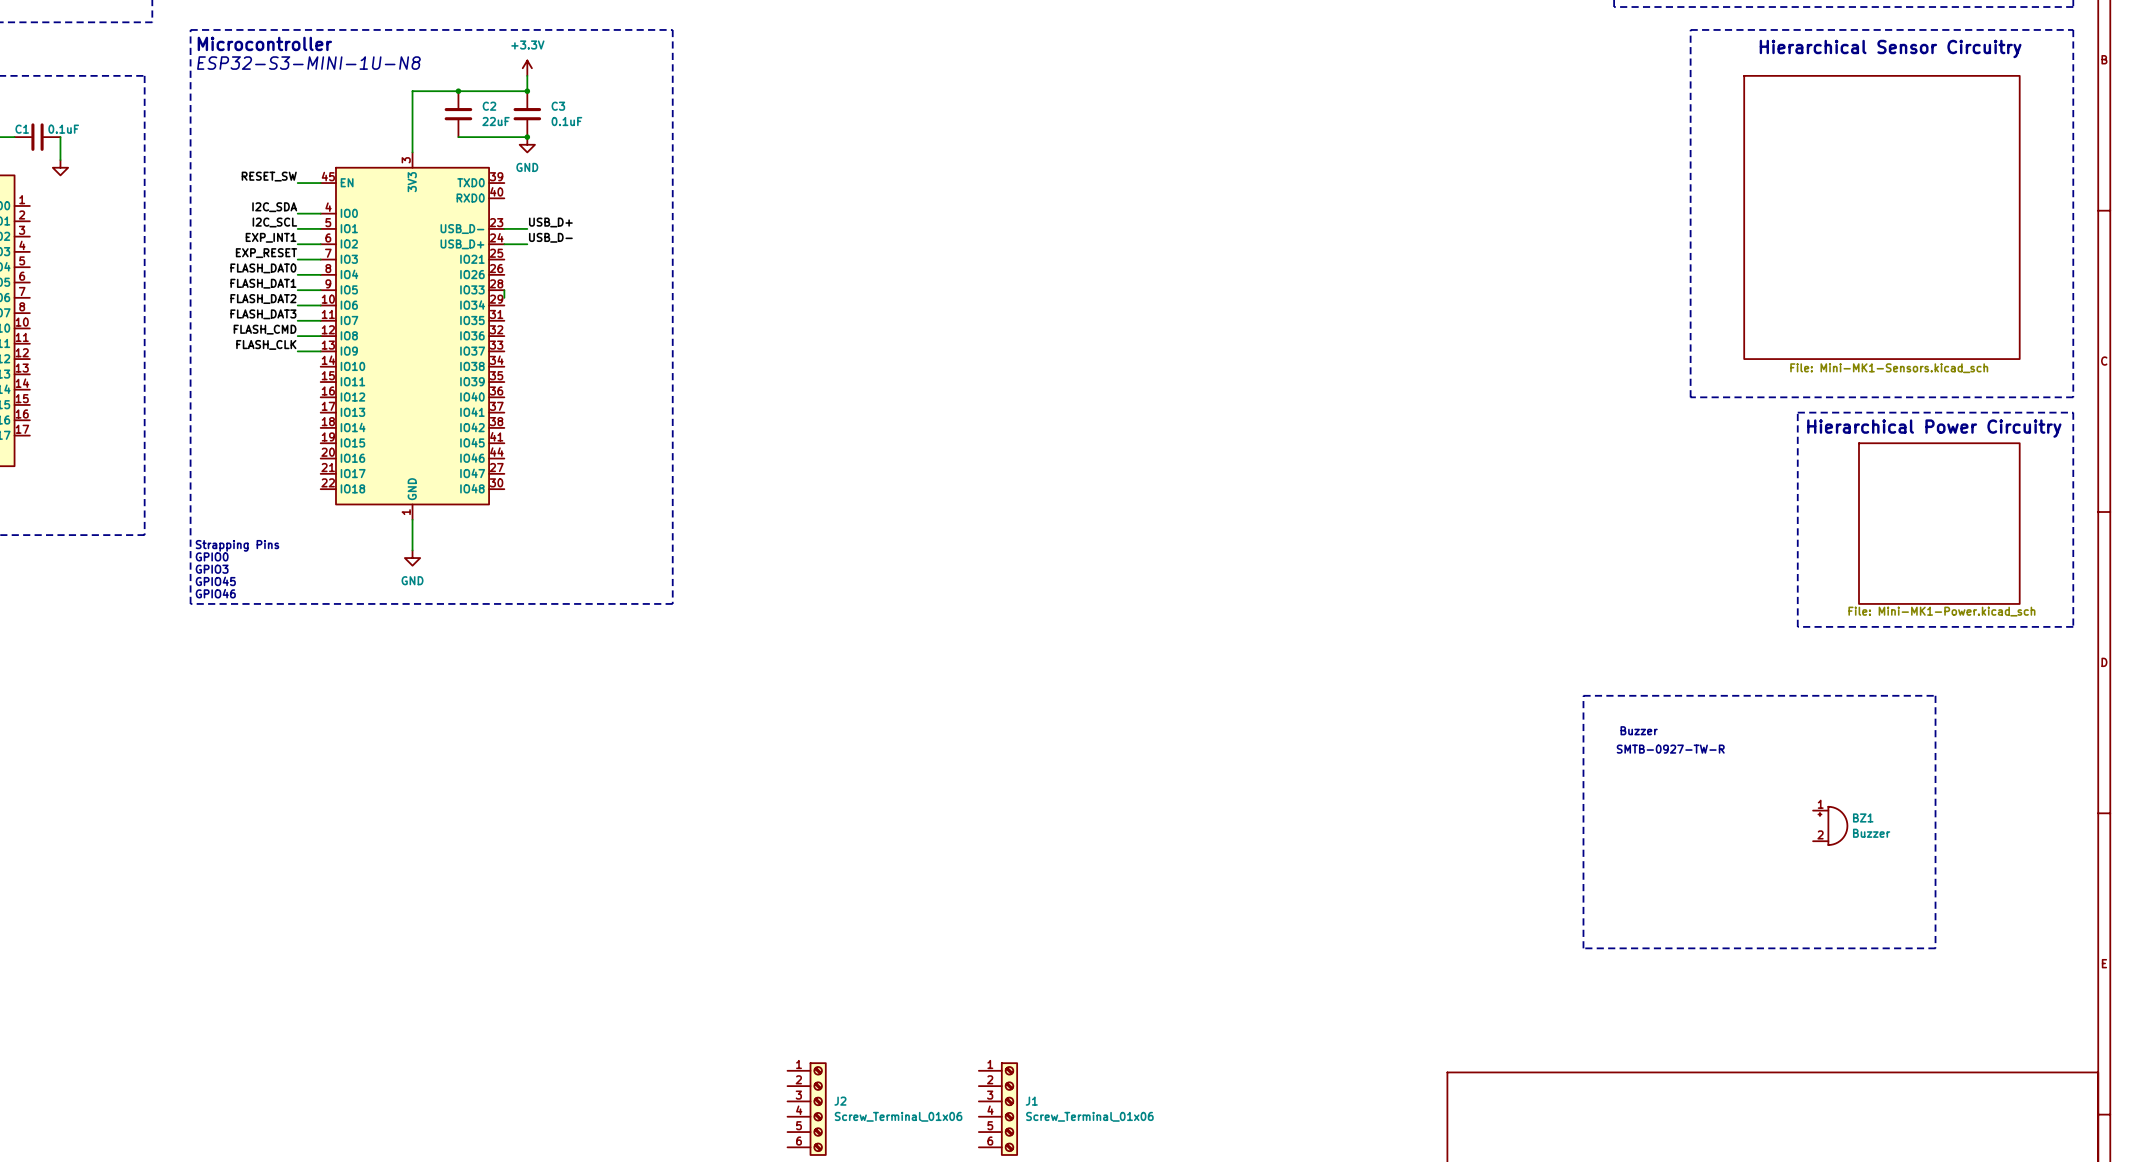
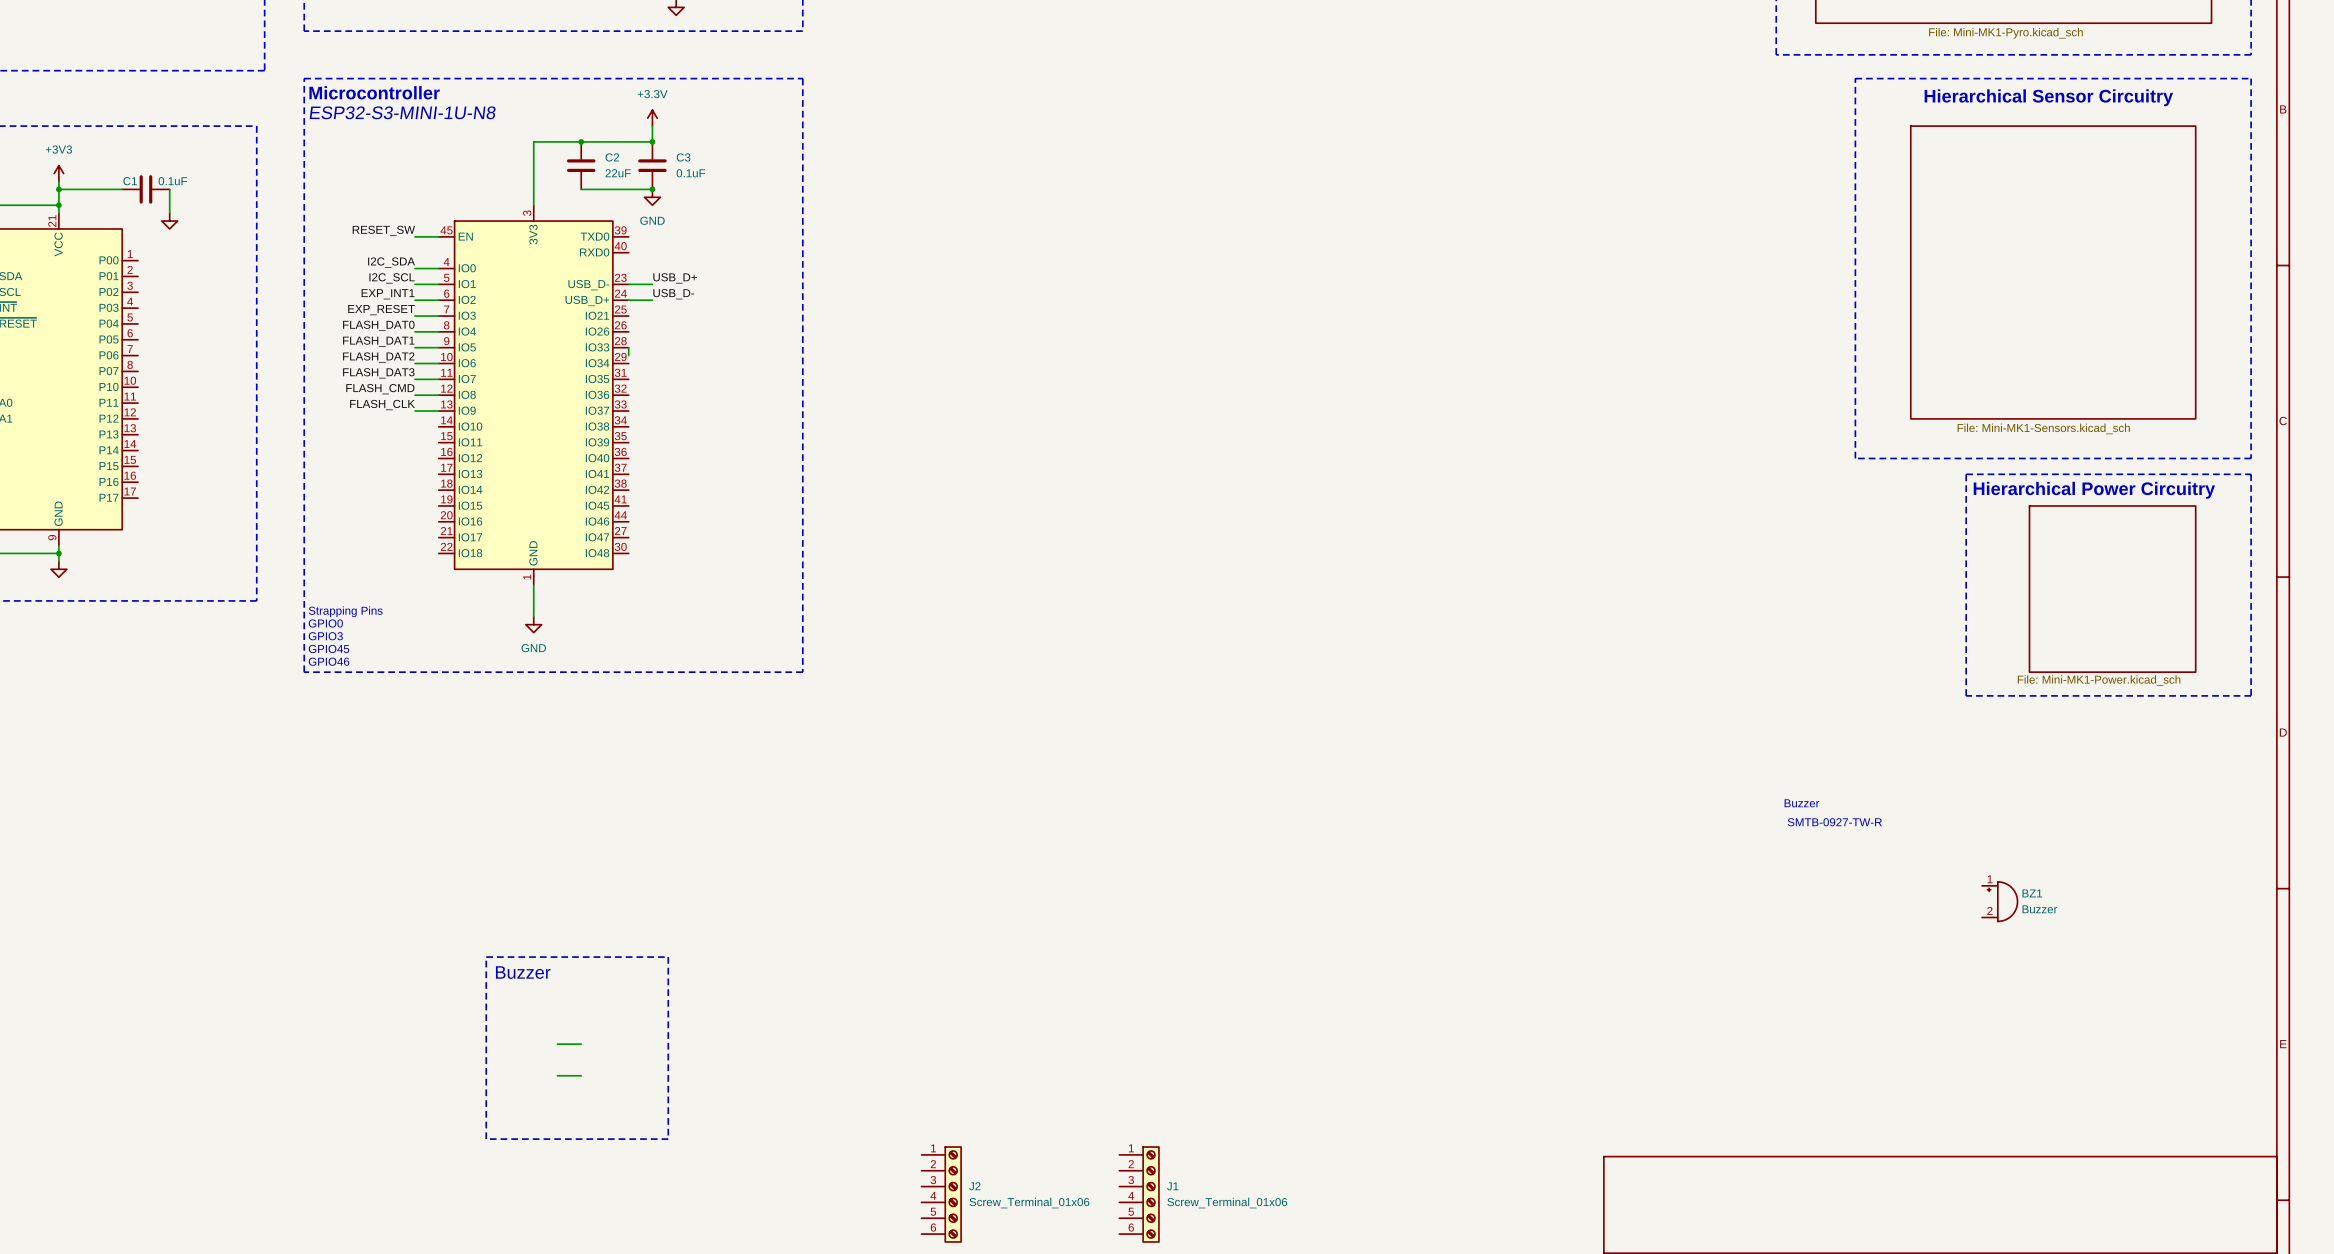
line: (1583, 695) (1935, 695) (1935, 948) (1583, 948) (1583, 695) -> none
line: none -> (486, 957) (668, 957) (668, 1139) (486, 1139) (486, 957)
text: none -> Buzzer (523, 972)
wire: none -> (557, 1044) (581, 1044)
wire: none -> (557, 1075) (581, 1075)

